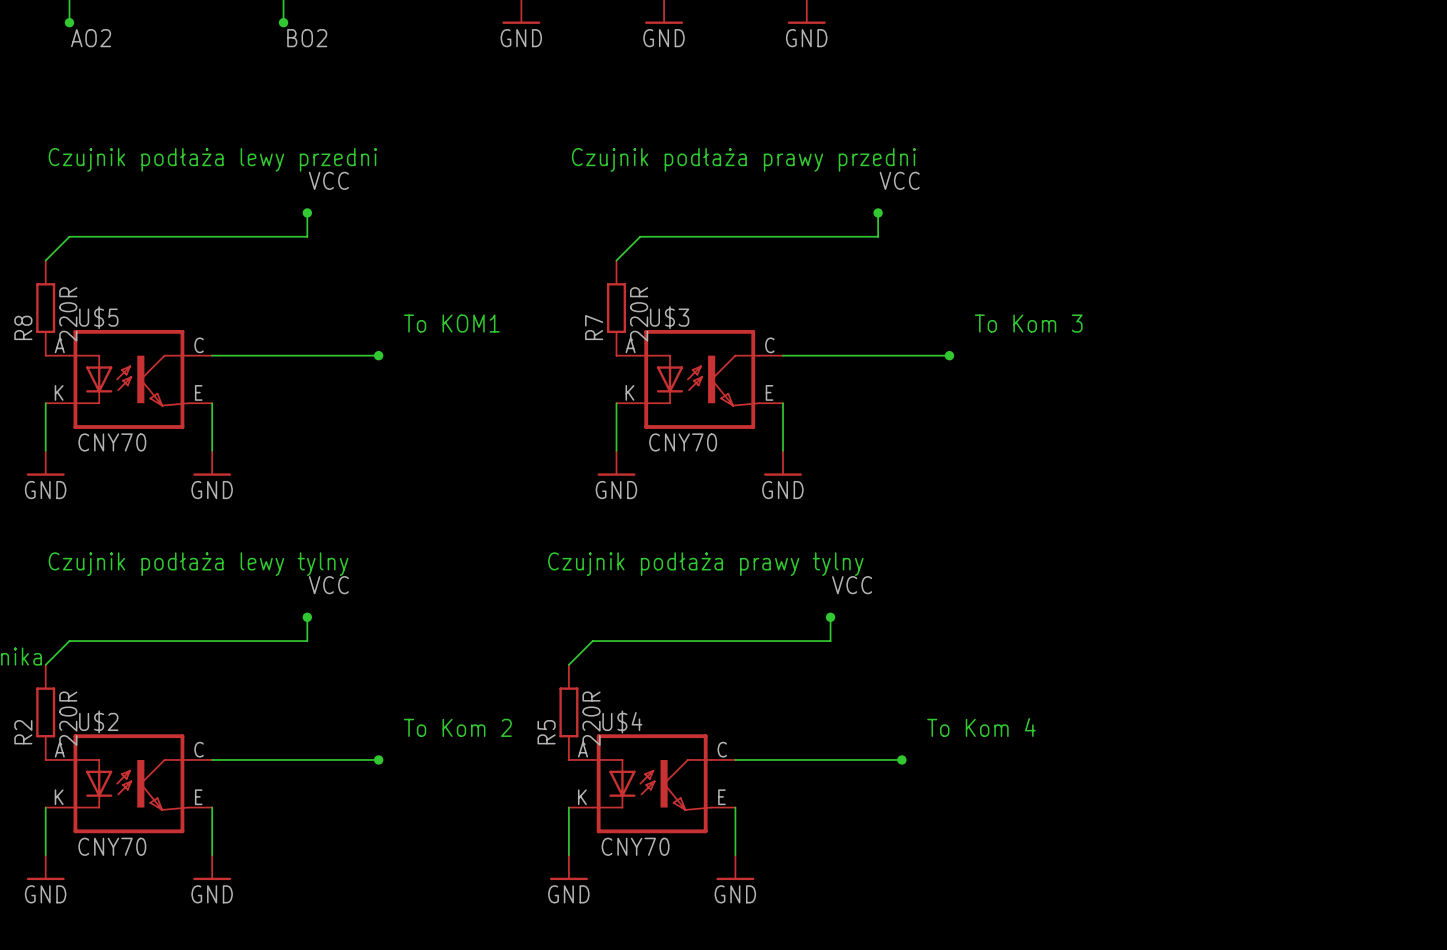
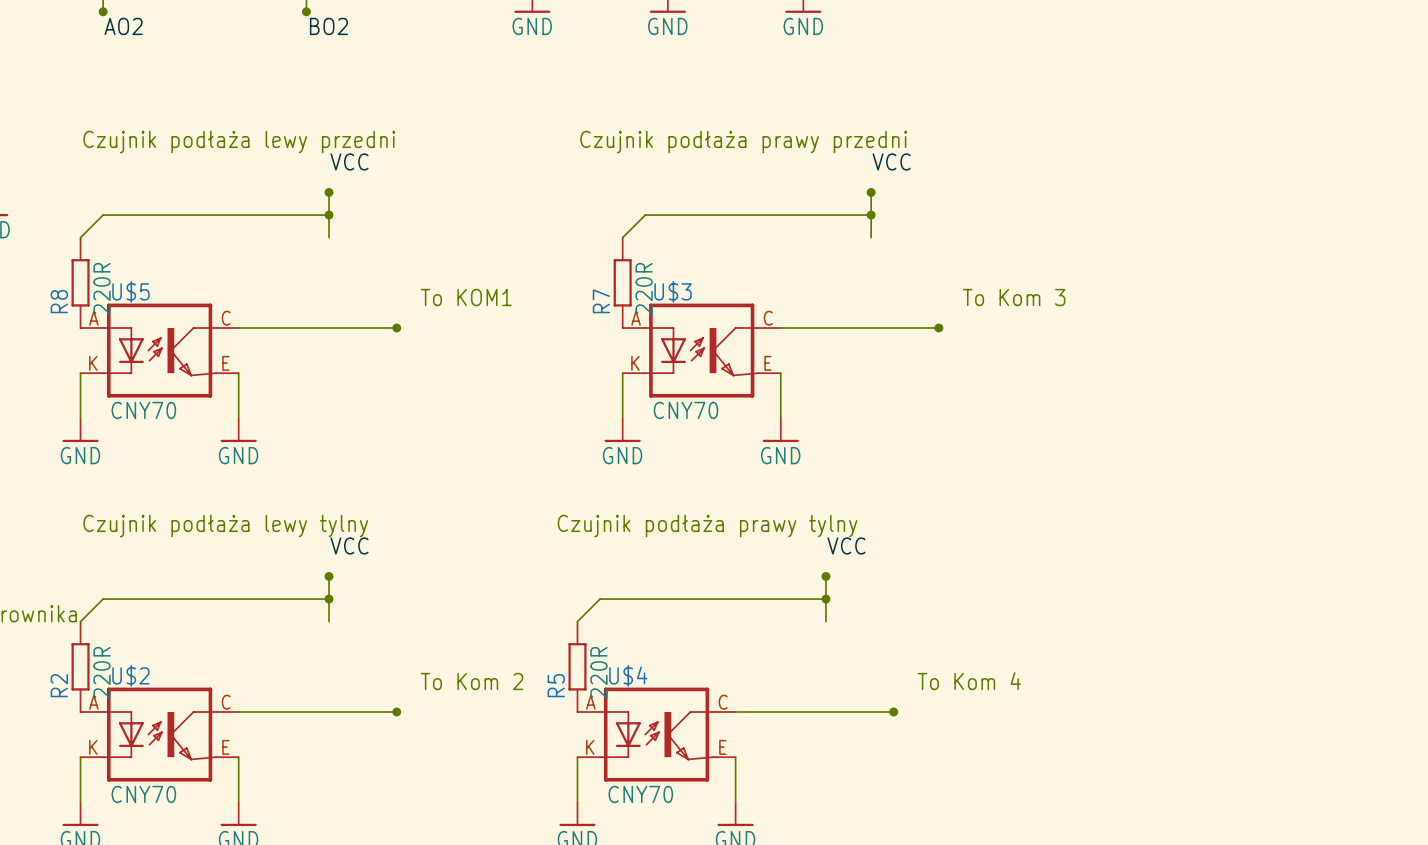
wire: none -> (329, 215) (329, 237)
junction: none -> (329, 215)
wire: none -> (871, 215) (871, 237)
junction: none -> (871, 215)
wire: none -> (329, 599) (329, 621)
junction: none -> (329, 599)
wire: none -> (825, 599) (825, 621)
junction: none -> (825, 599)

